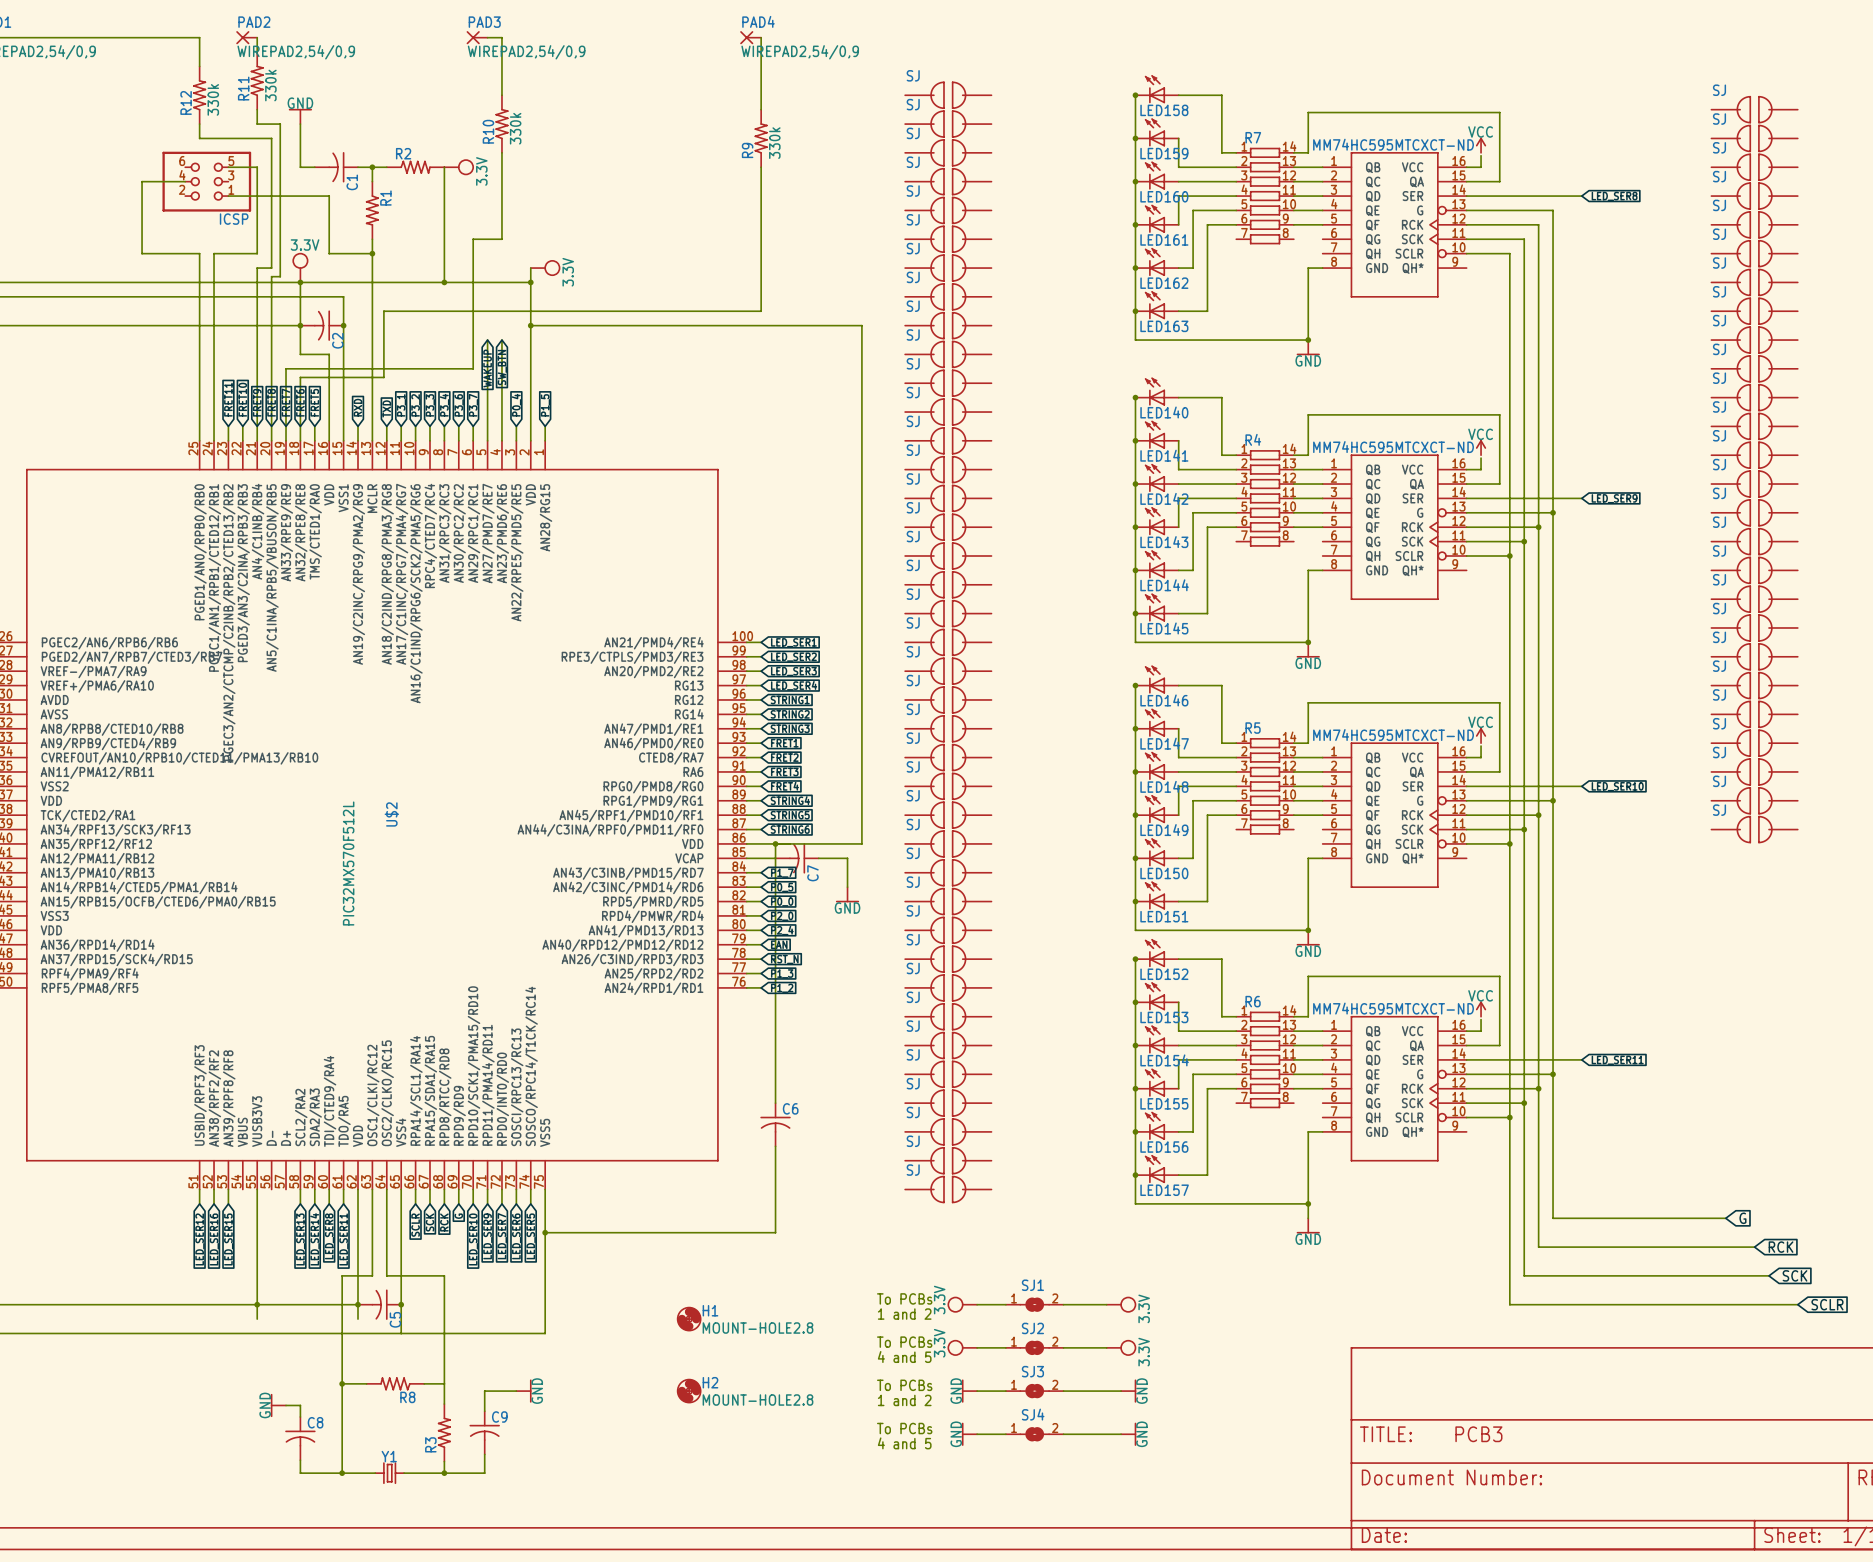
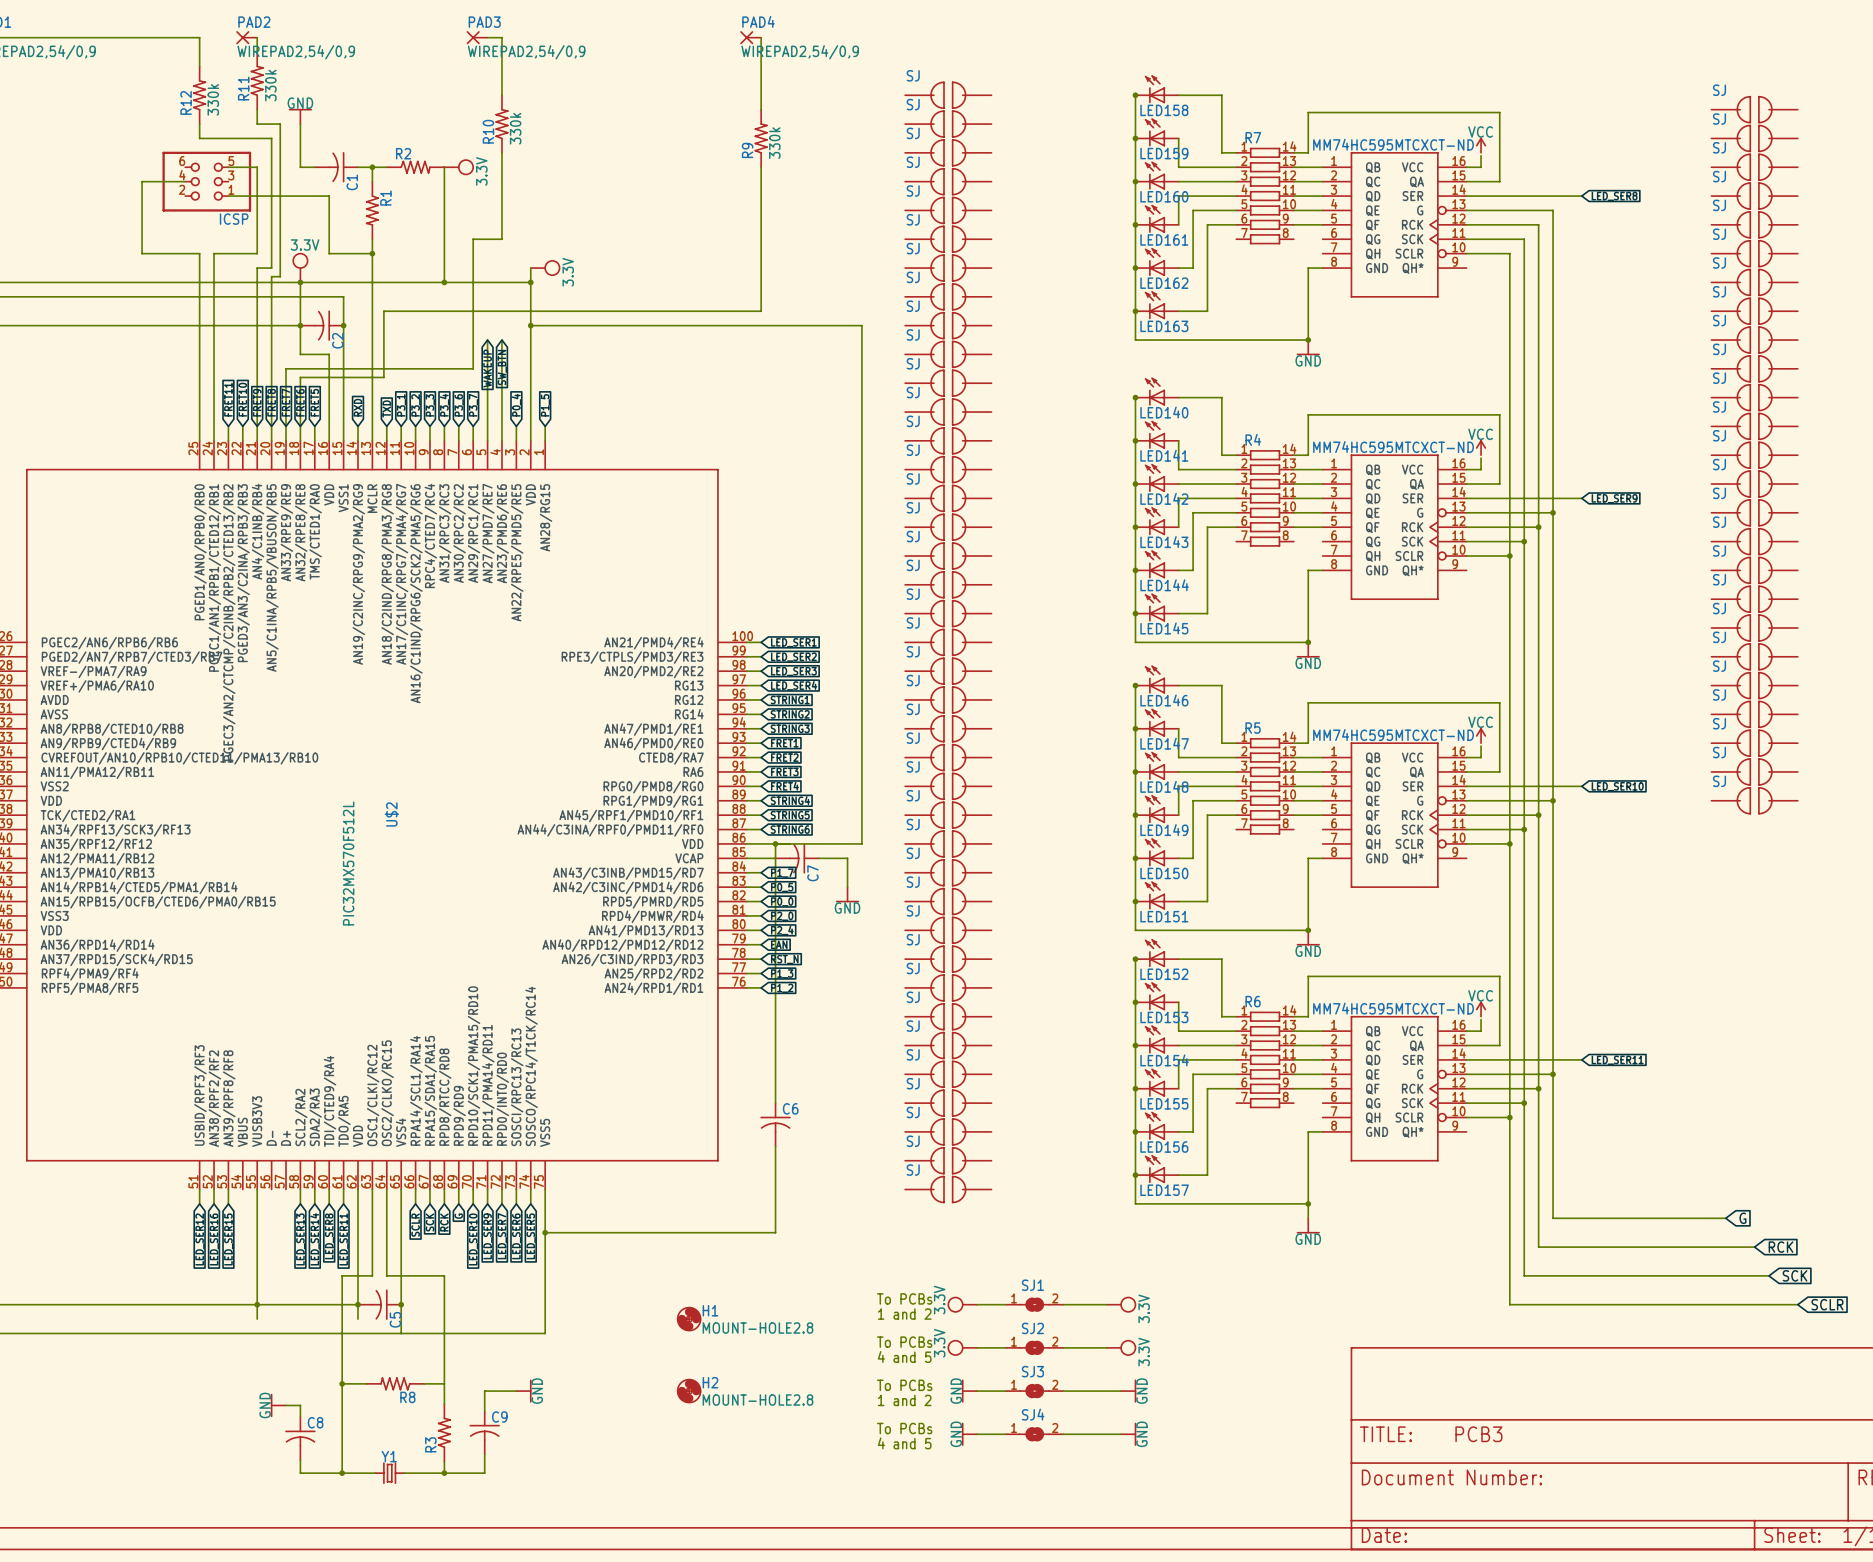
part: (1754, 829) -> none

